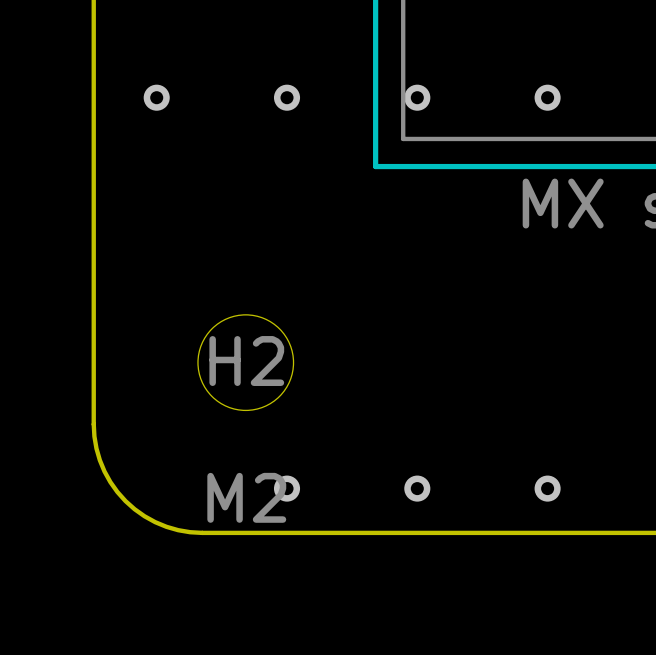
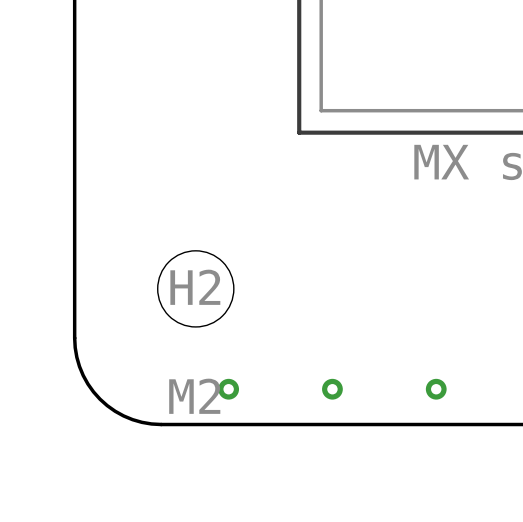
via: (156, 97) -> none
via: (287, 97) -> none
via: (417, 97) -> none
via: (547, 97) -> none

